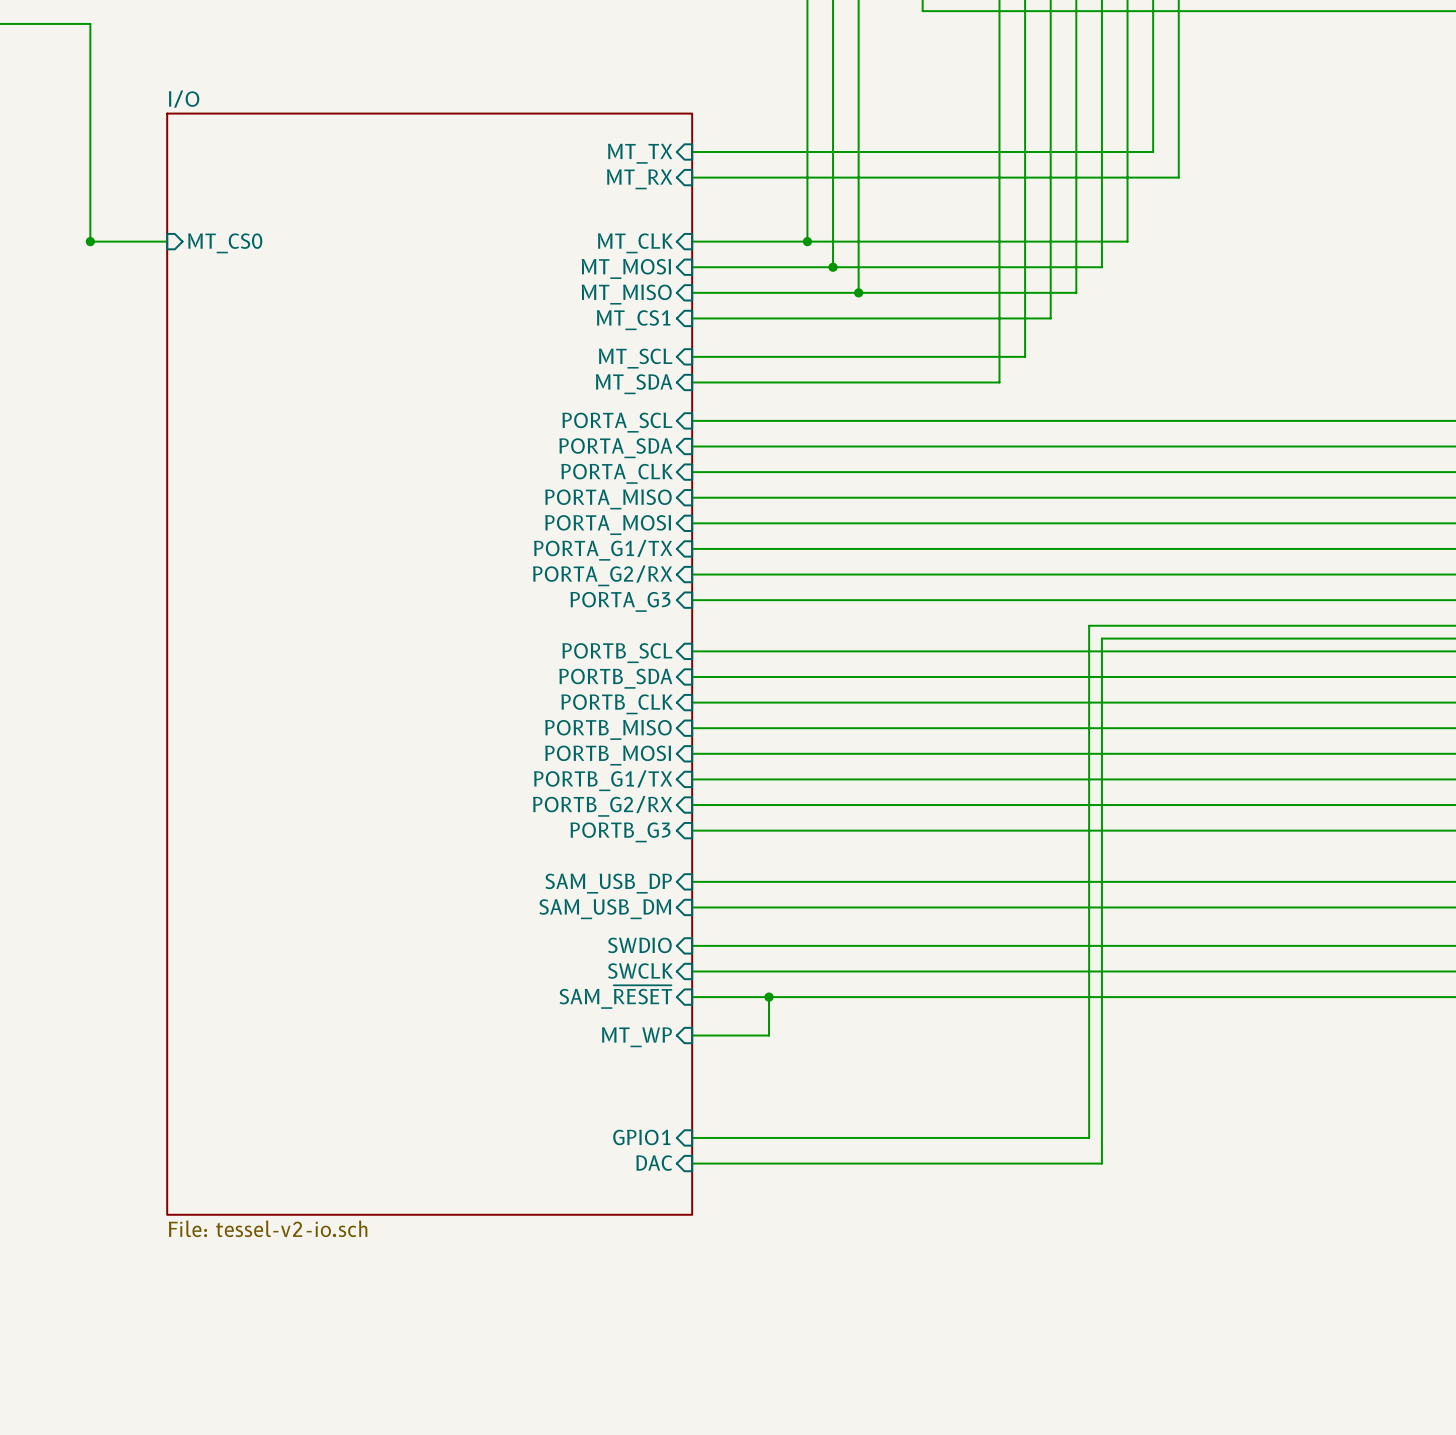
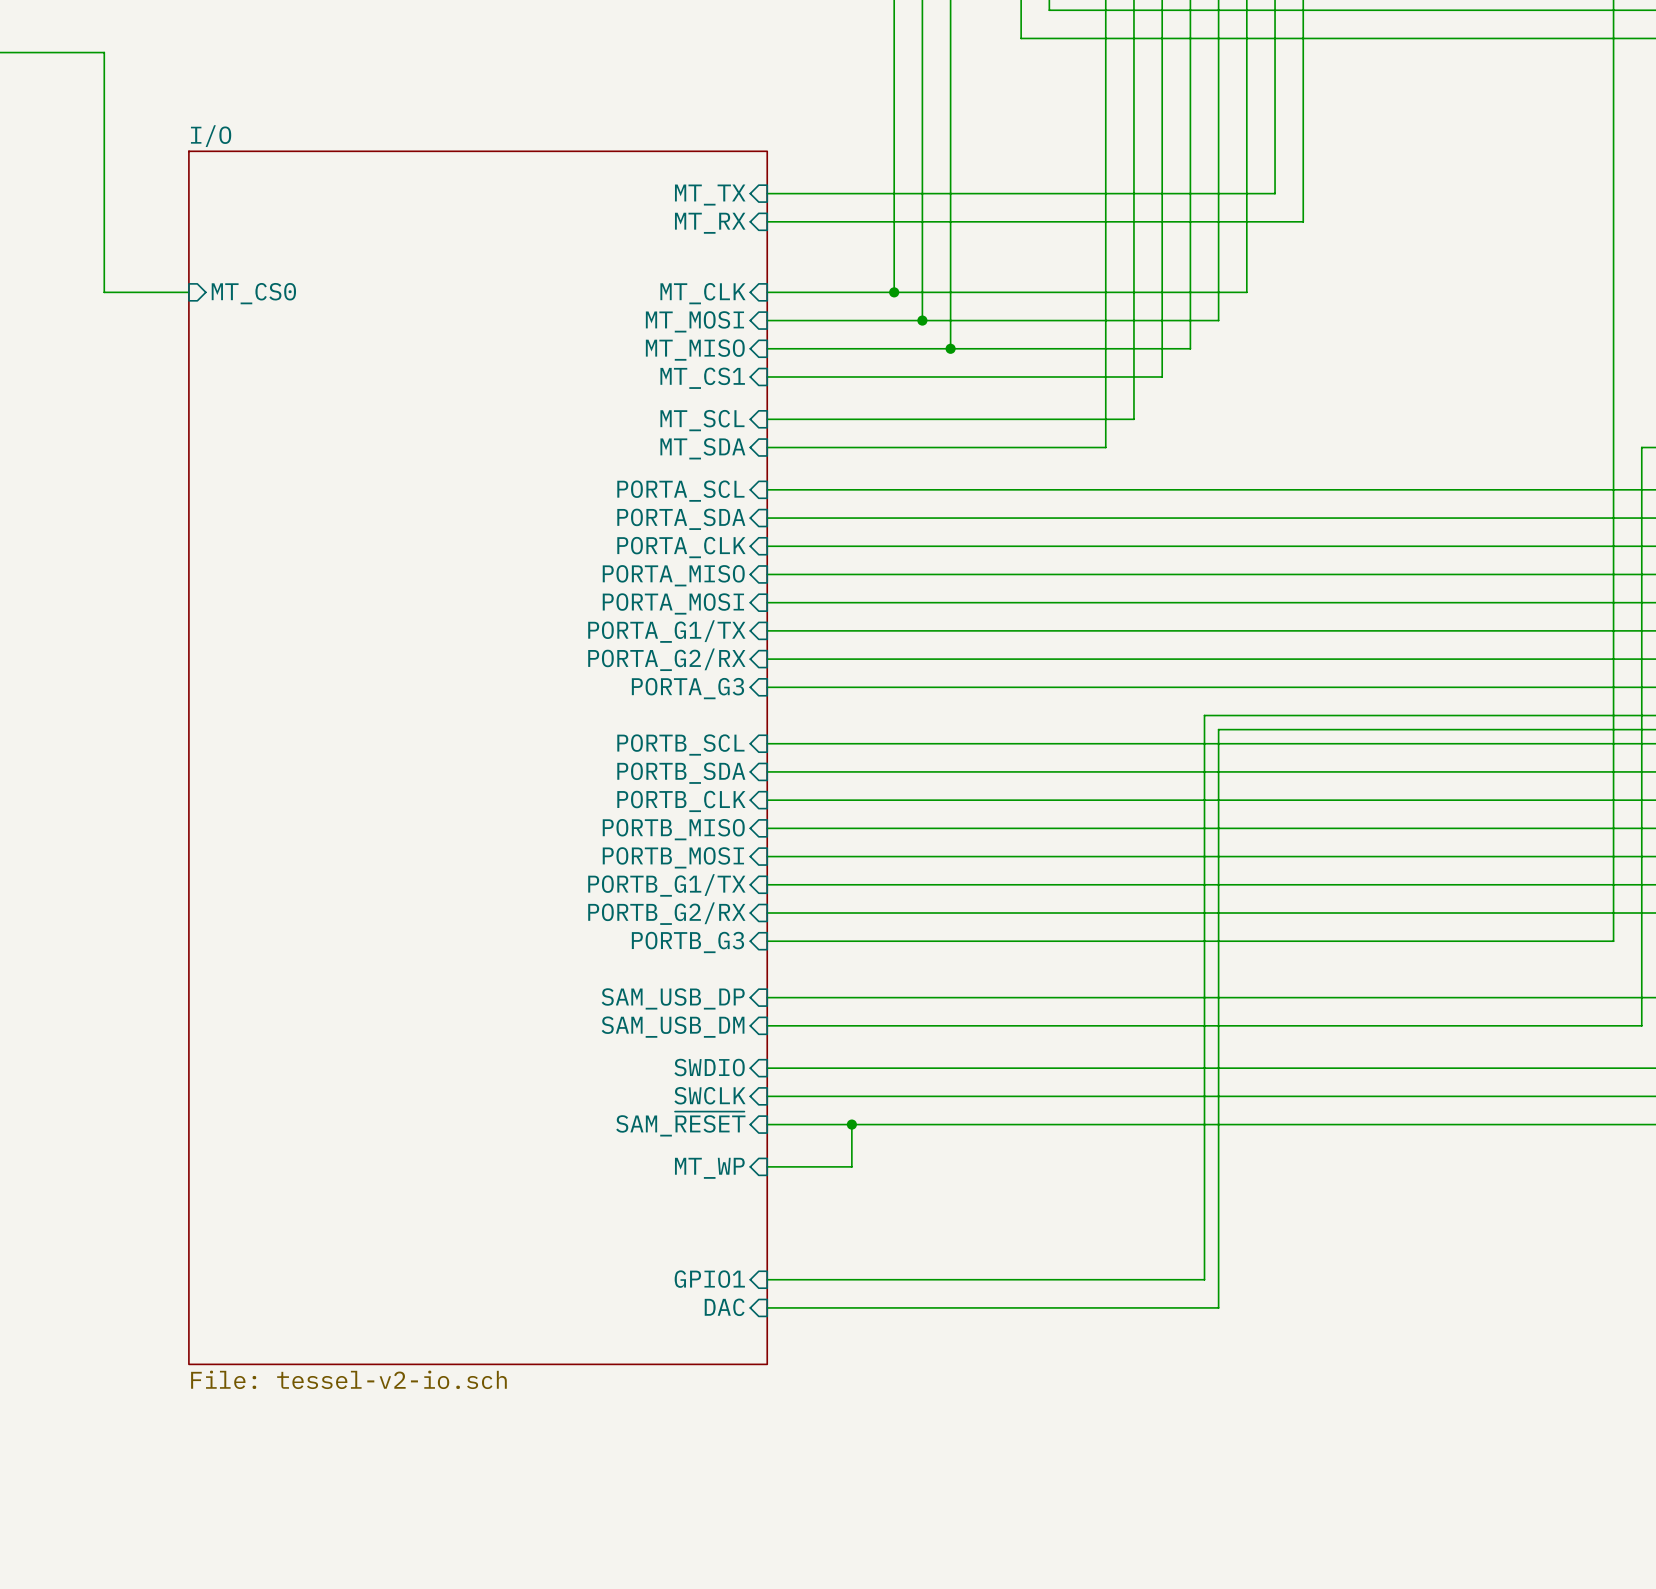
junction: (90, 241) -> none

